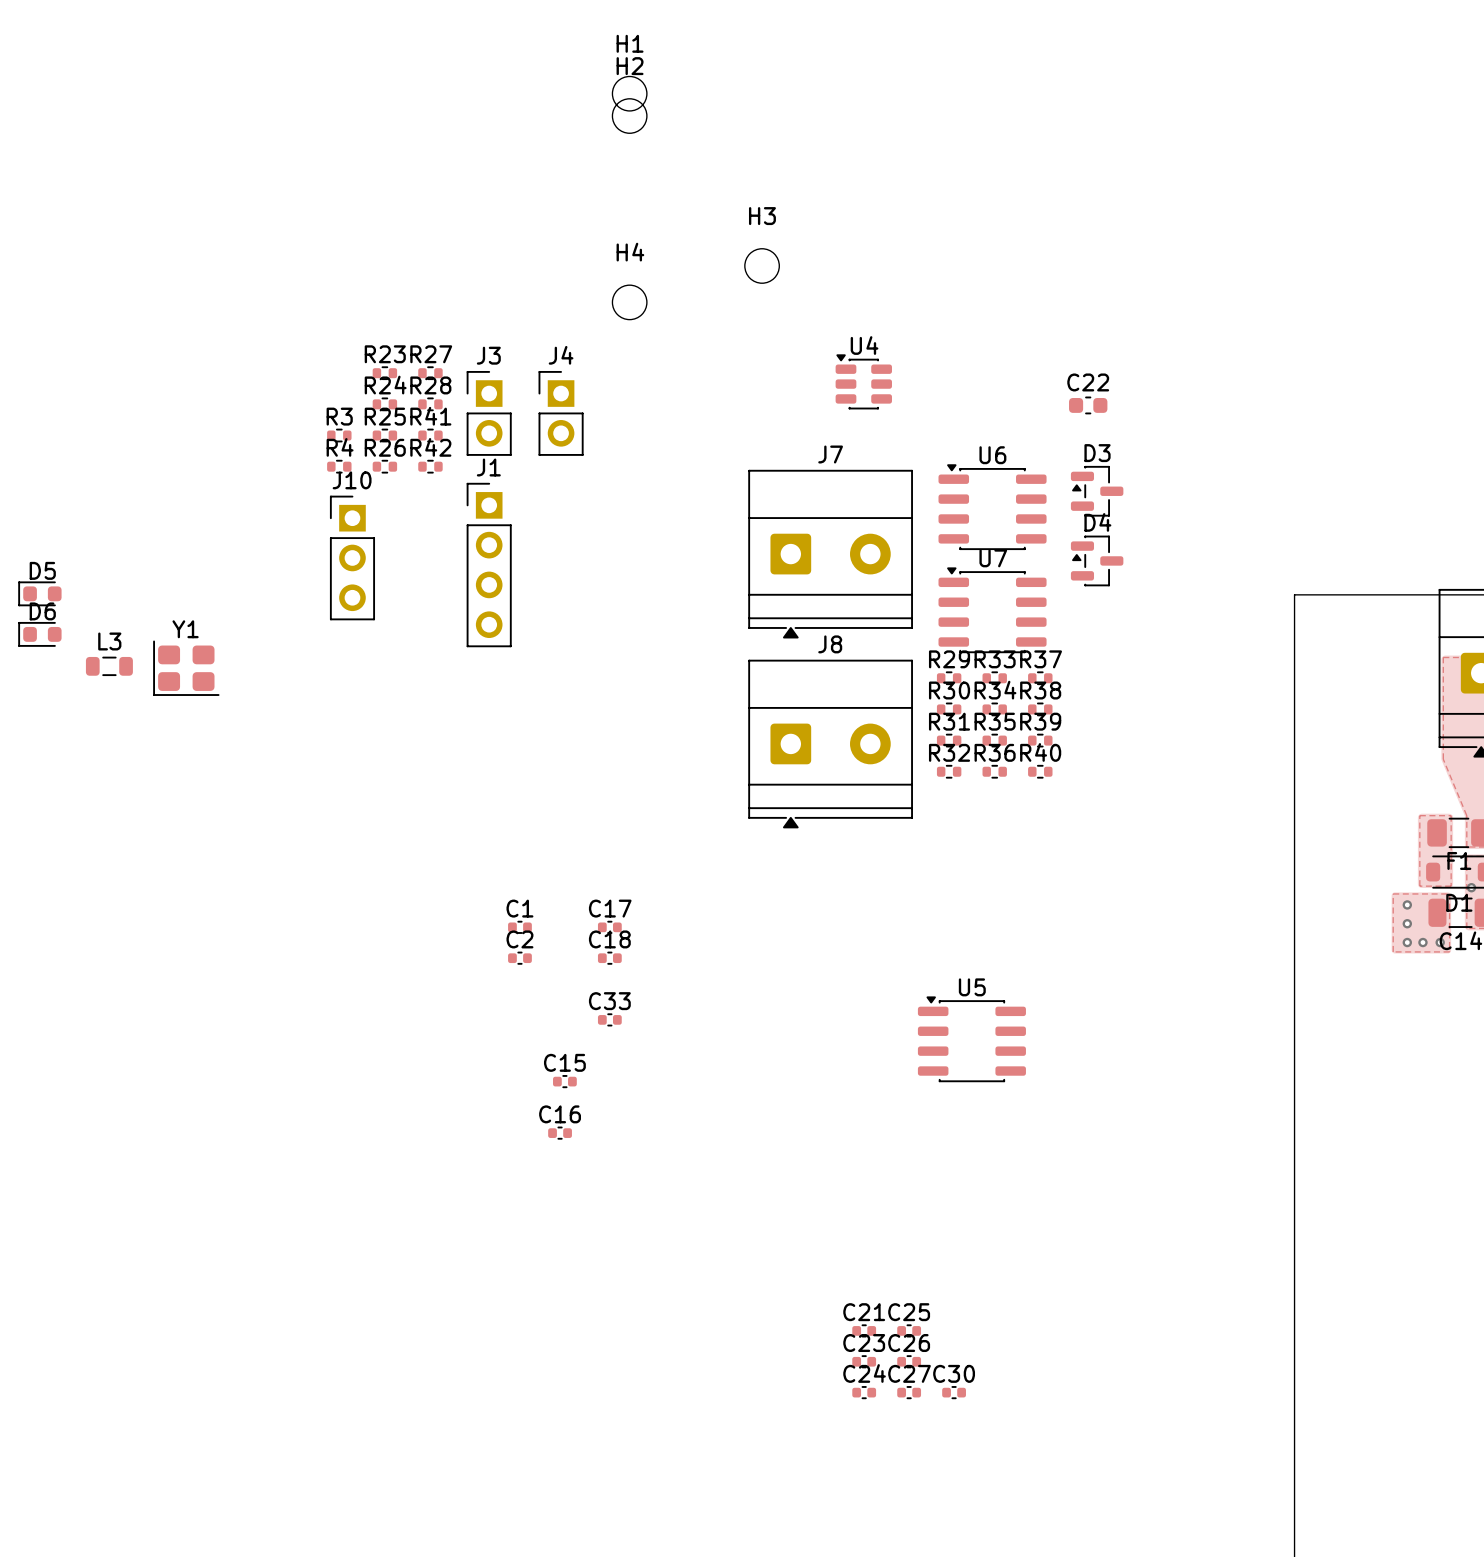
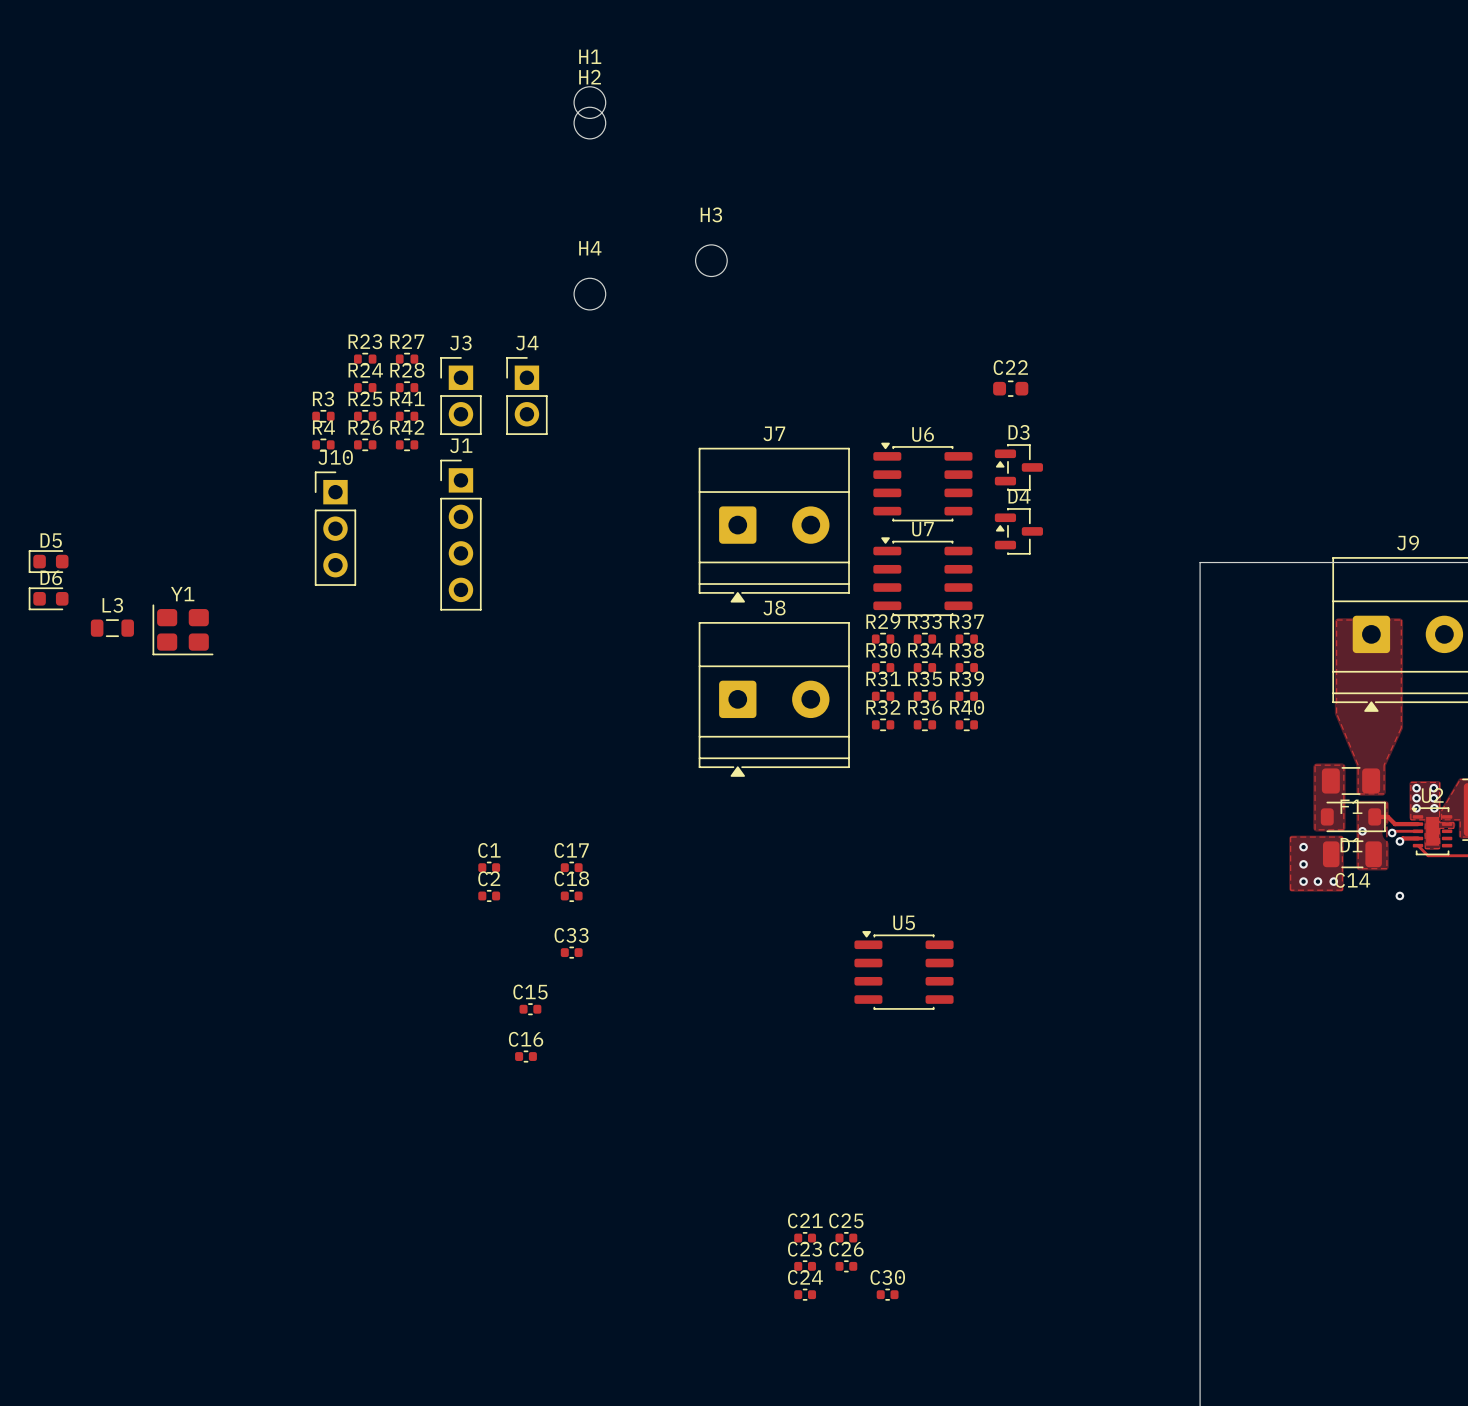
U4: (863, 381) -> none
C27: (909, 1392) -> none

